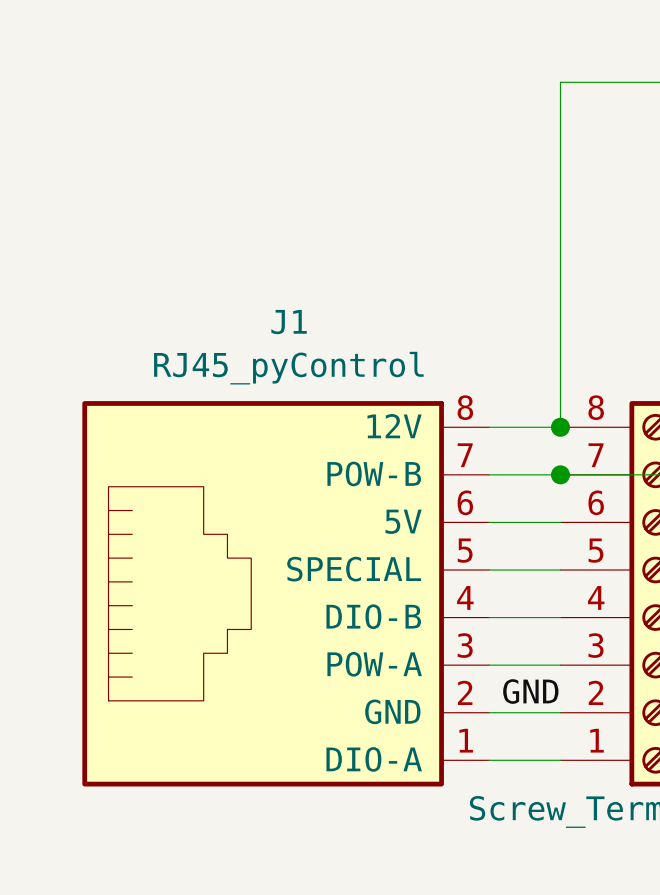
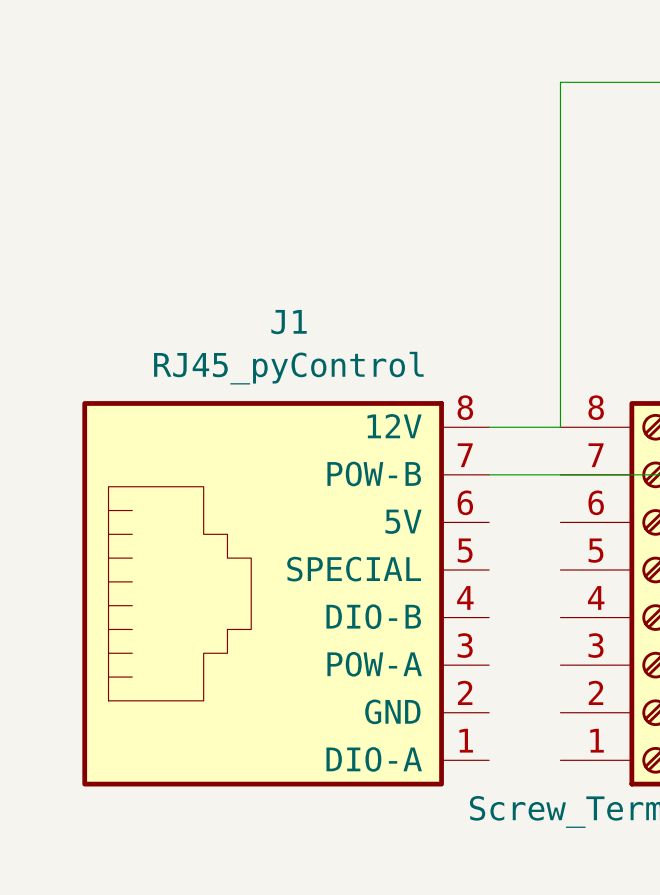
junction: (560, 427) -> none
junction: (560, 474) -> none
wire: (489, 522) (560, 522) -> none
wire: (489, 570) (560, 570) -> none
wire: (489, 617) (560, 617) -> none
wire: (489, 665) (560, 665) -> none
label: GND (530, 691) -> none
wire: (489, 712) (560, 712) -> none
wire: (489, 760) (560, 760) -> none

